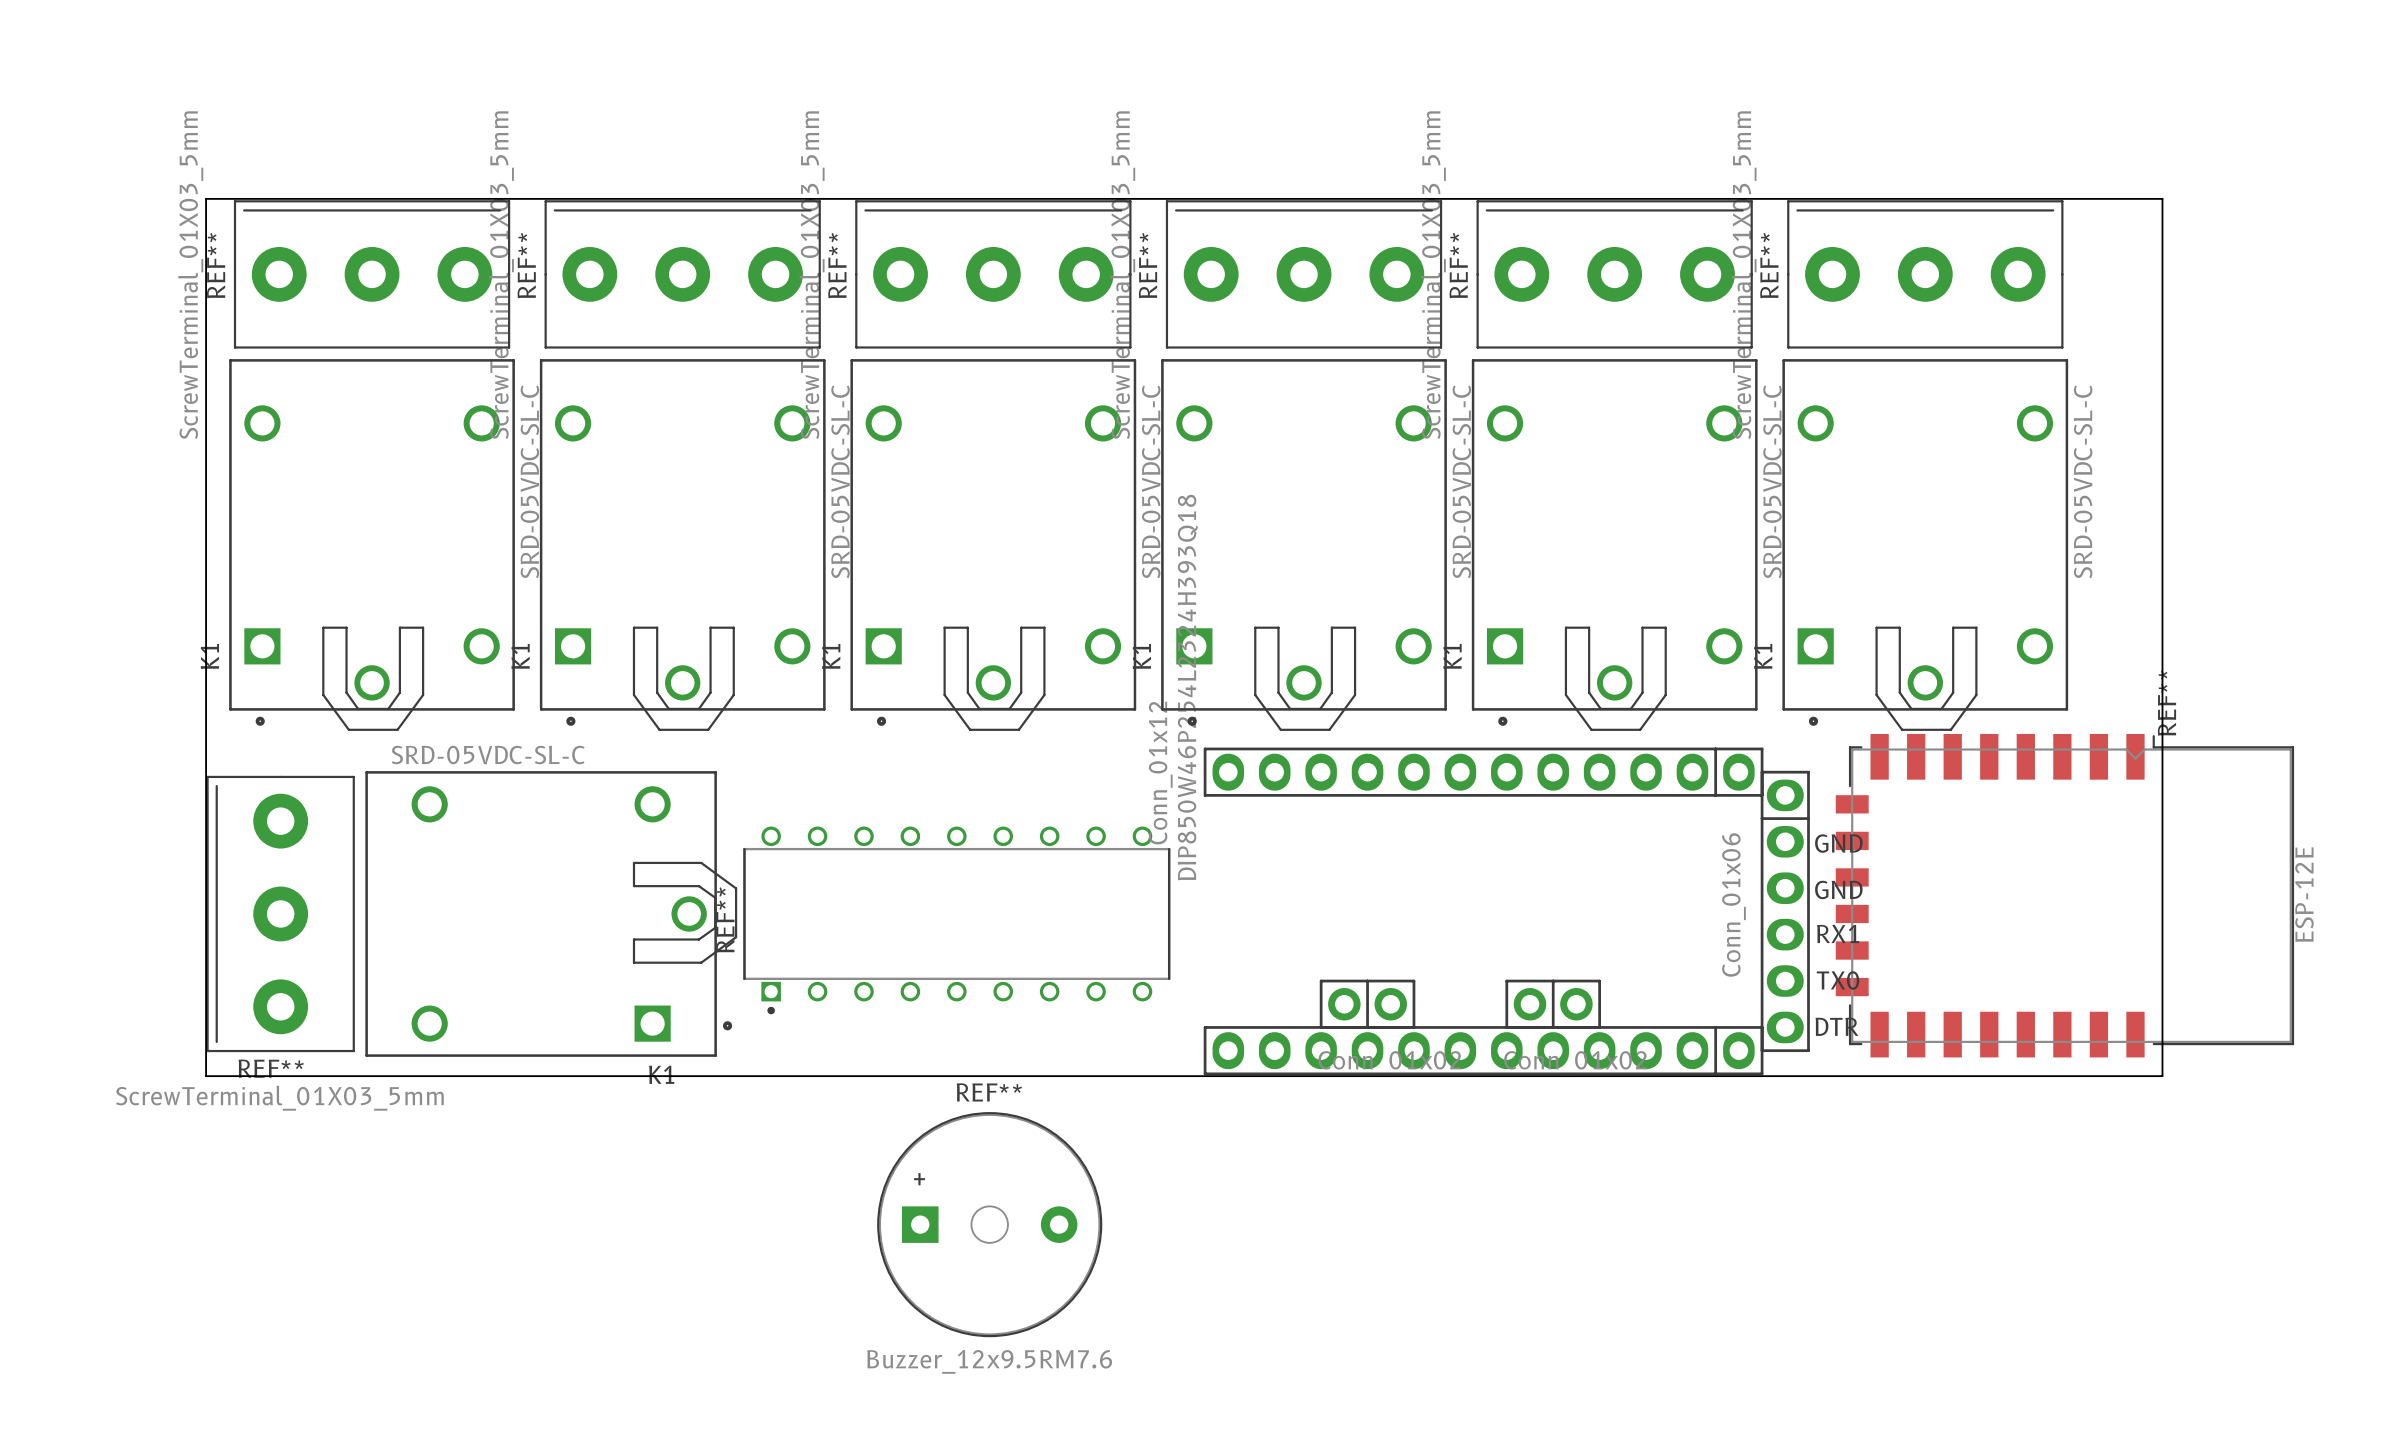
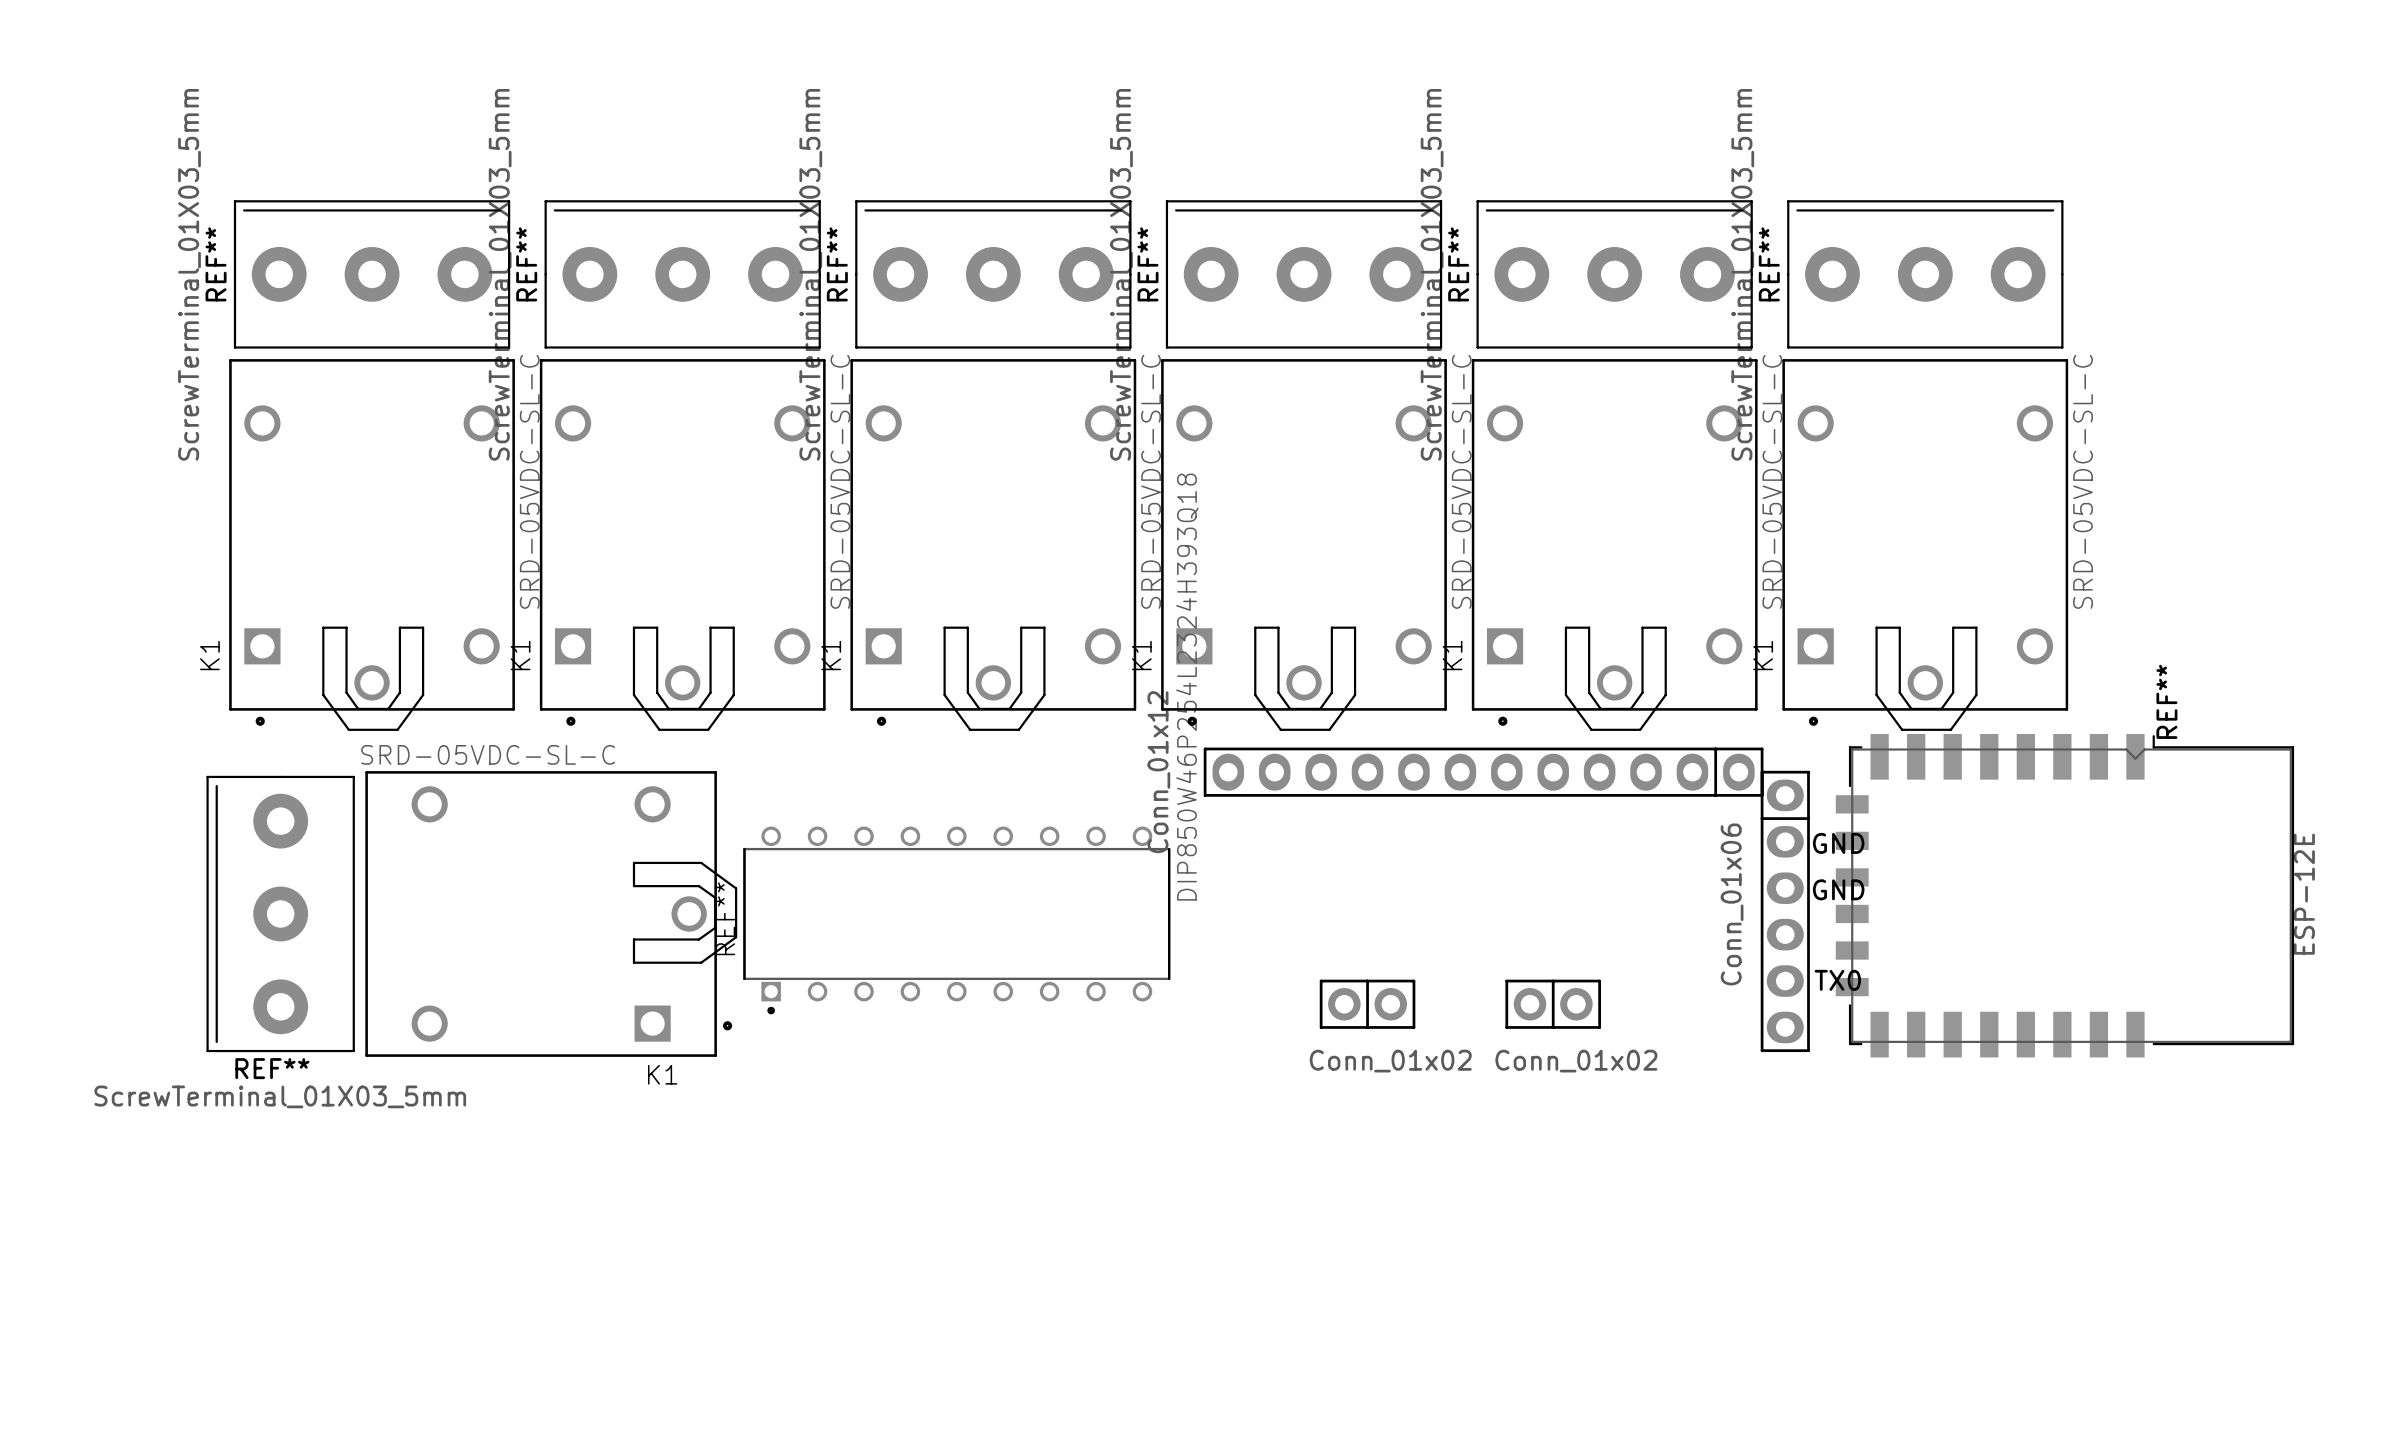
board edge: (206, 198) (2162, 198) (2162, 1076) (206, 1076) (206, 198) -> none
text: RX1 (1838, 933) -> none
text: DTR (1836, 1026) -> none
part: (1483, 1050) -> none
REF**: Buzzer_12x9.5RM7.6 (989, 1224) -> none

